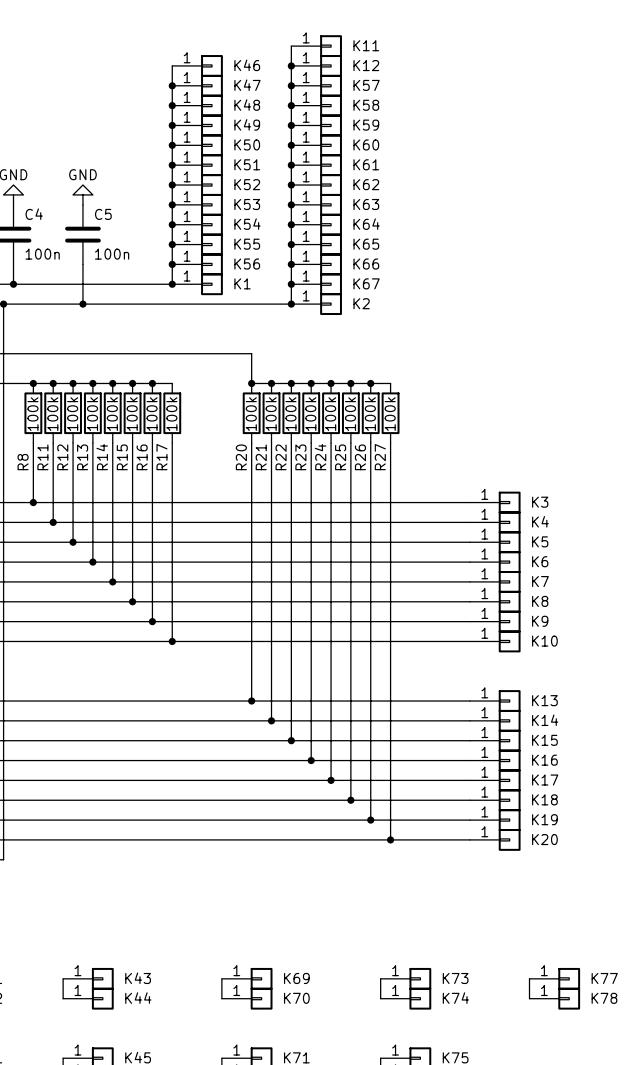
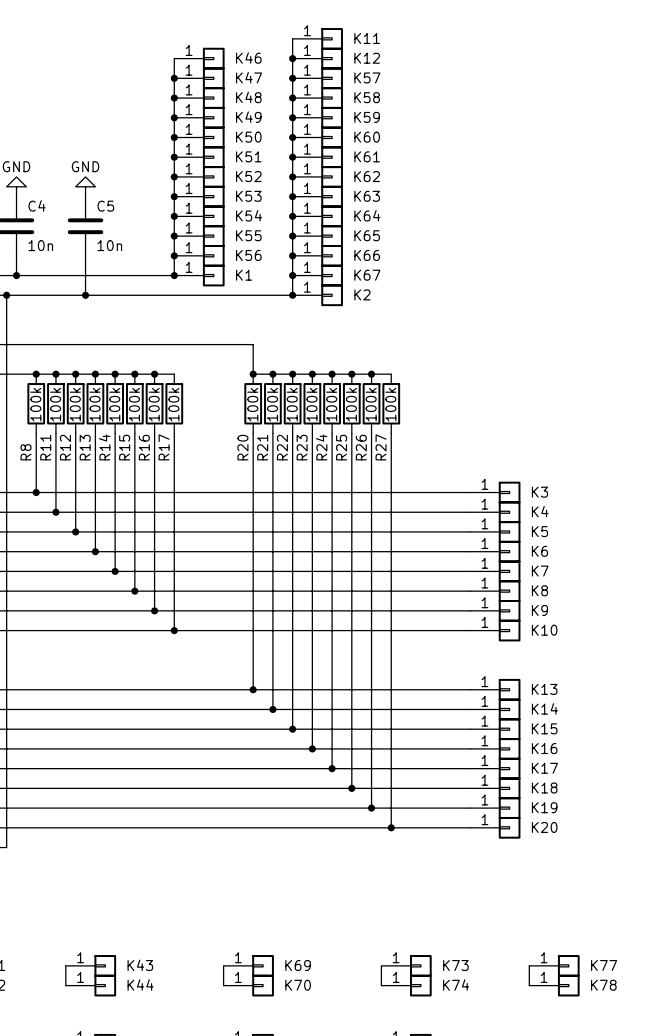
C4 value: 100n (42, 254) -> 10n (40, 245)
C5 value: 100n (112, 254) -> 10n (109, 245)

